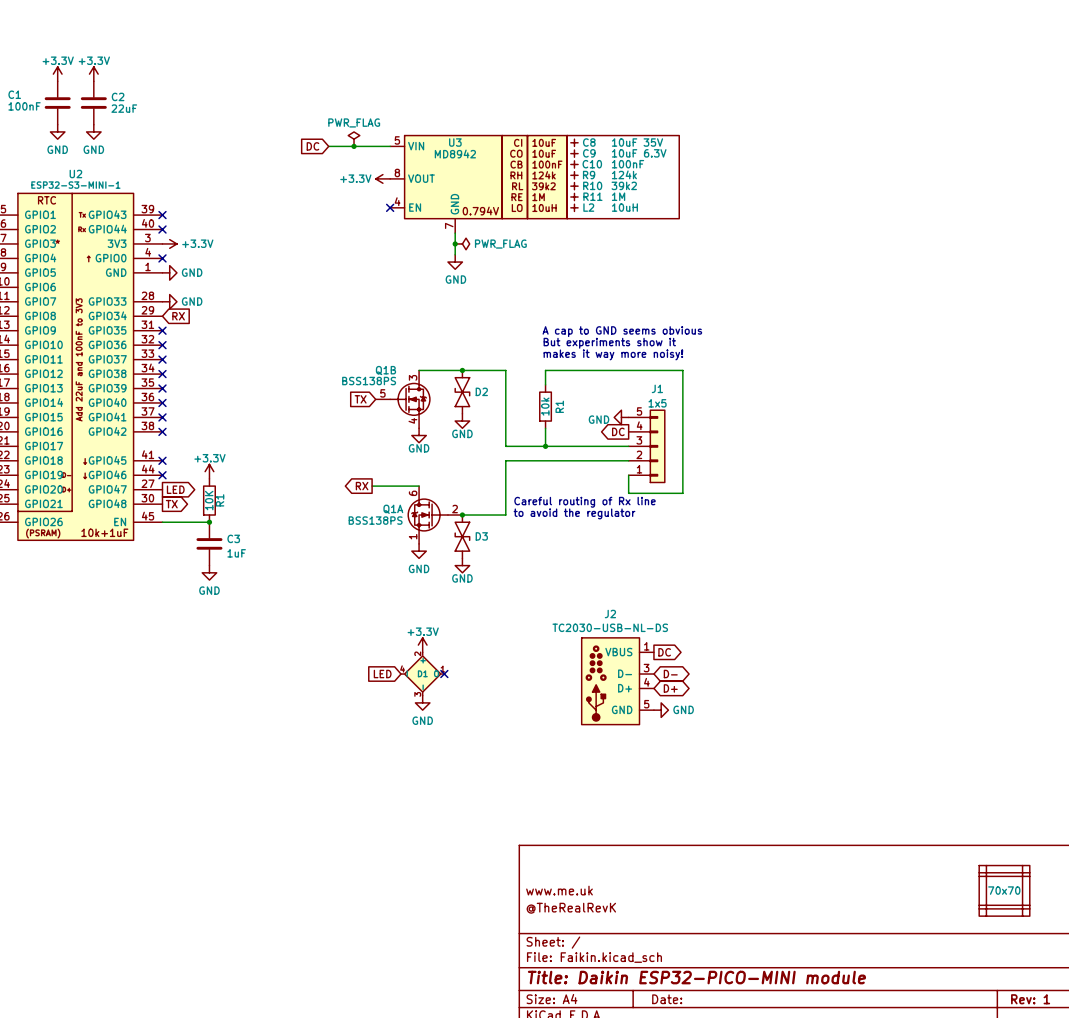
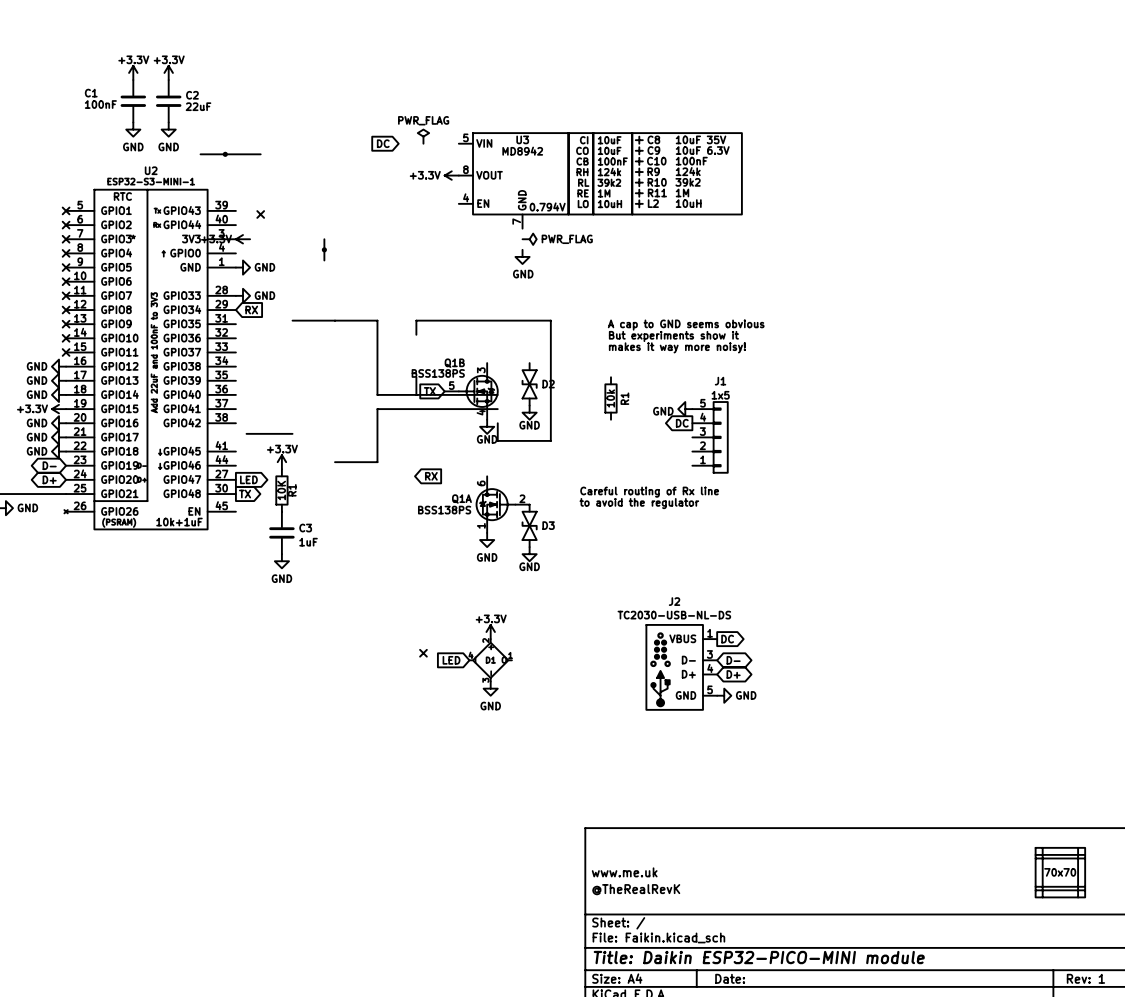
wire: (328, 146) (390, 146) -> none
junction: (354, 146) -> none
wire: none -> (200, 154) (260, 154)
junction: none -> (225, 154)
no-connect mark: (390, 207) -> none
no-connect mark: (162, 215) -> none
no-connect mark: none -> (260, 214)
no-connect mark: (162, 229) -> none
wire: (455, 233) (455, 254) -> none
power symbol rotation: 0° (169, 243) -> 180° (243, 239)
wire: none -> (324, 239) (324, 260)
junction: (455, 243) -> none
junction: none -> (324, 249)
no-connect mark: (162, 258) -> none
wire: none -> (292, 320) (377, 320) (377, 394) (497, 394)
no-connect mark: (162, 330) -> none
wire: none -> (416, 334) (416, 320) (550, 320) (550, 440) (497, 440) (497, 423)
no-connect mark: (162, 345) -> none
no-connect mark: (162, 359) -> none
wire: (419, 370) (505, 370) (505, 446) (628, 446) -> none
junction: (462, 370) -> none
no-connect mark: (162, 374) -> none
wire: none -> (416, 377) (416, 394)
wire: (545, 384) (545, 370) (682, 370) (682, 493) (628, 493) (628, 475) -> none
no-connect mark: (162, 388) -> none
no-connect mark: (162, 402) -> none
no-connect mark: (162, 417) -> none
wire: none -> (497, 409) (377, 409) (377, 462) (335, 462)
wire: (545, 428) (545, 446) -> none
no-connect mark: (162, 431) -> none
junction: (545, 446) -> none
no-connect mark: (162, 460) -> none
wire: (628, 460) (505, 460) (505, 515) (462, 515) -> none
no-connect mark: (162, 475) -> none
wire: (372, 486) (419, 486) -> none
junction: (462, 515) -> none
wire: (162, 522) (209, 522) -> (246, 433) (292, 433)
junction: (209, 522) -> none
no-connect mark: none -> (423, 653)
no-connect mark: (444, 674) -> none

